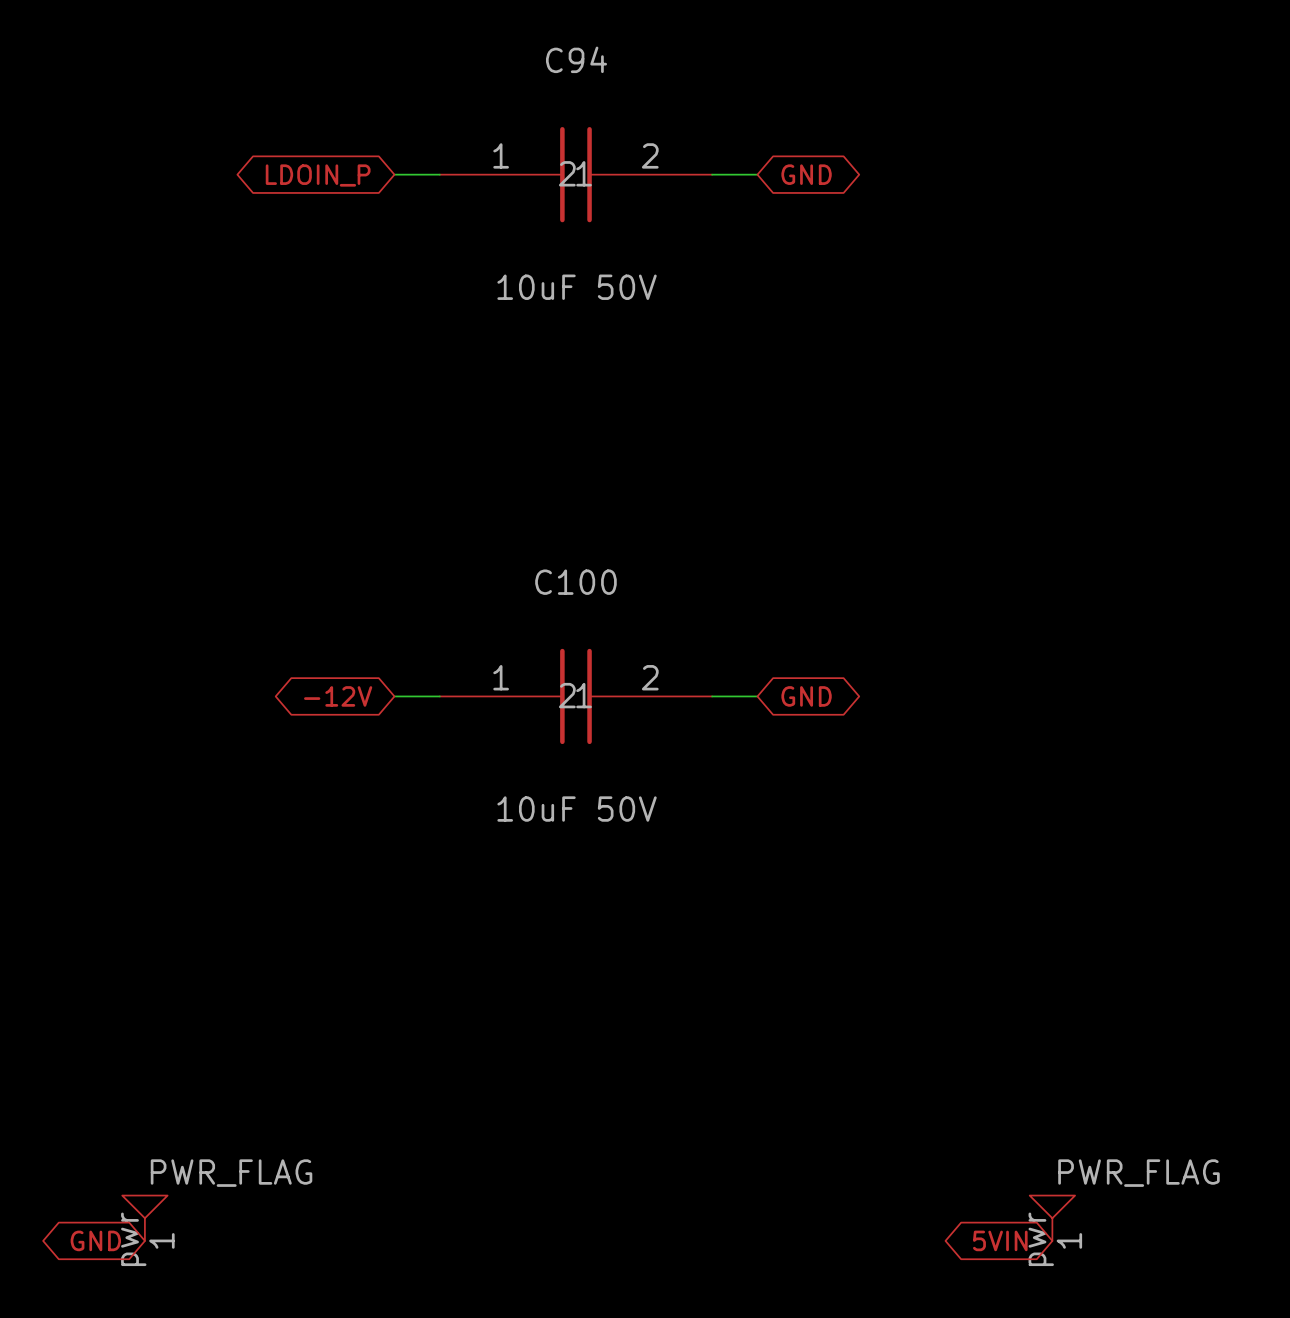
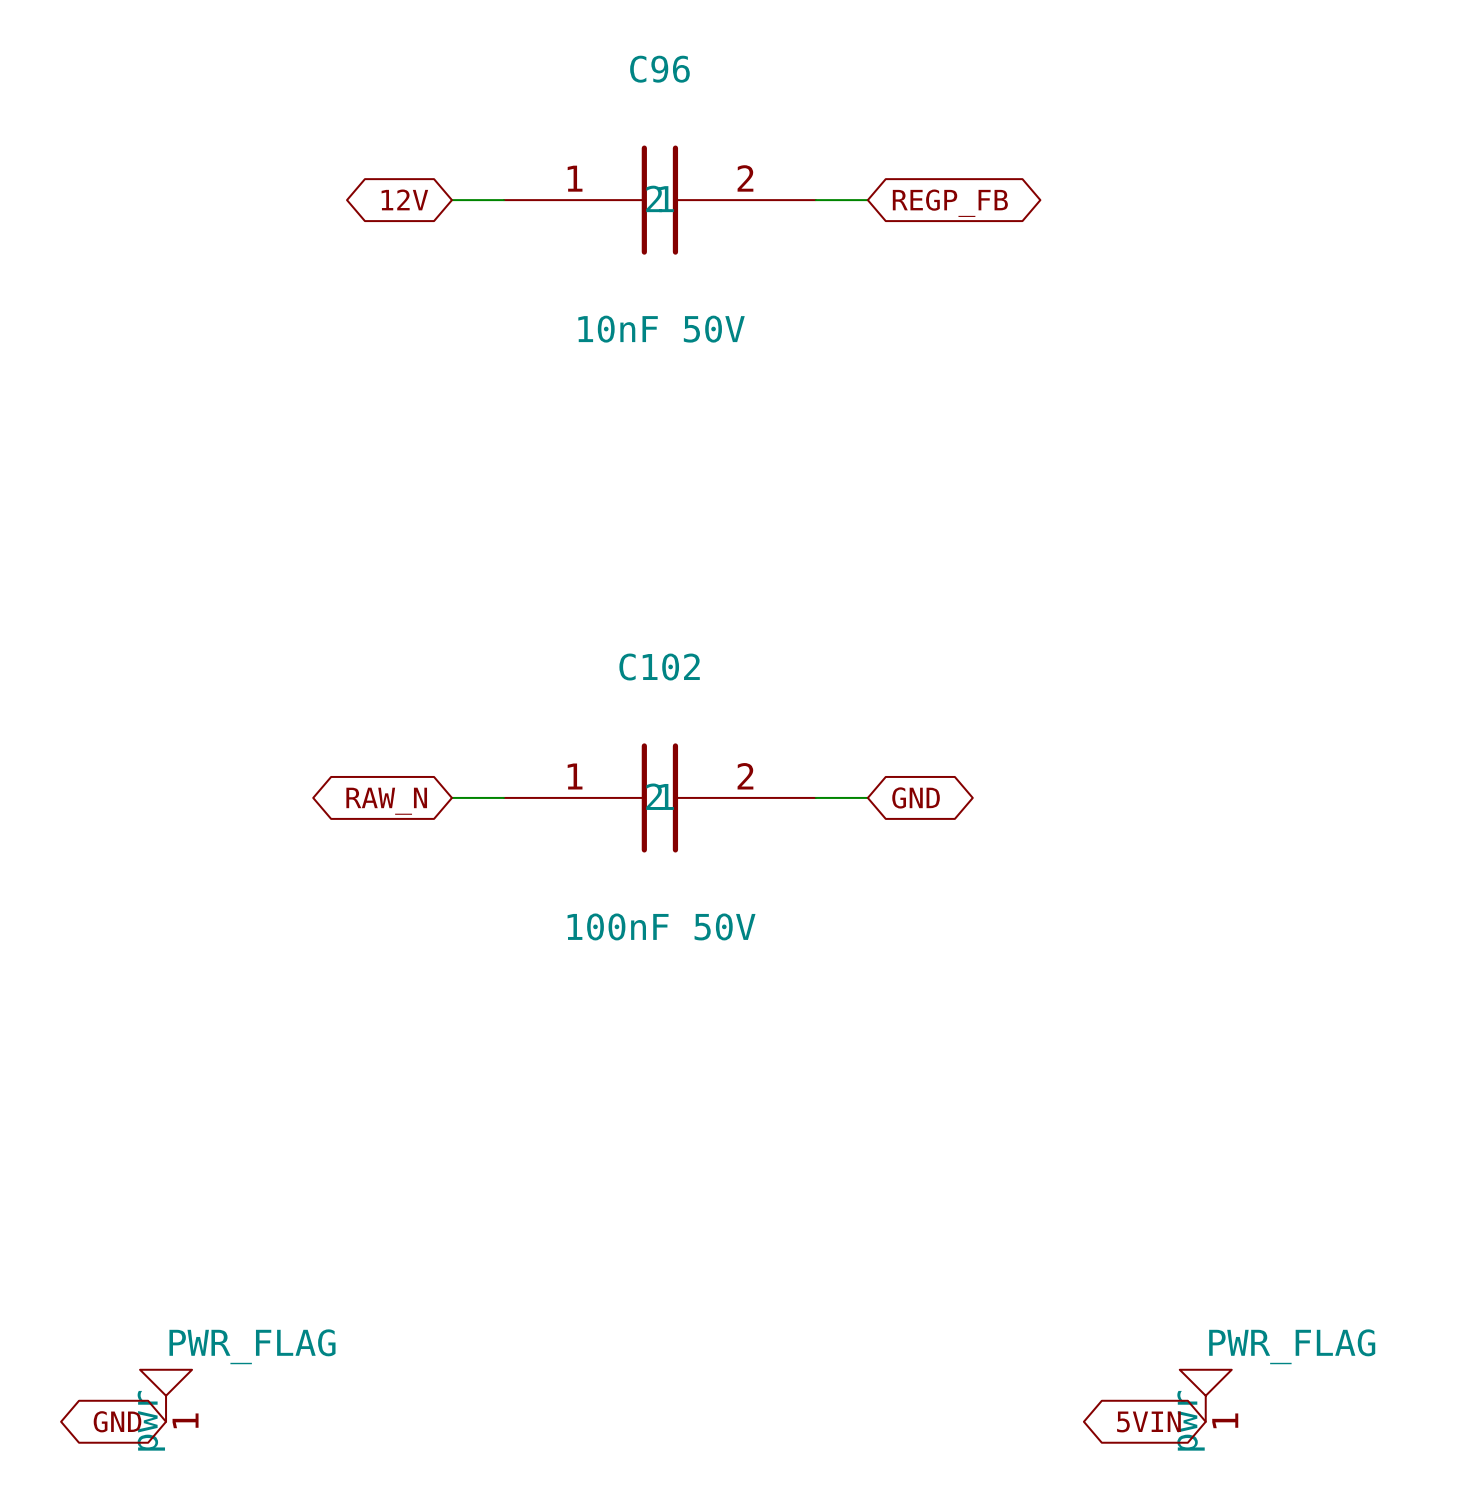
C94 name: C94 (576, 59) -> C96 (659, 69)
global label: GND (806, 174) -> REGP_FB (950, 203)
global label: LDOIN_P (318, 175) -> 12V (404, 199)
C94 value: 10uF 50V (577, 287) -> 10nF 50V (661, 329)
C100 name: C100 (575, 582) -> C102 (659, 667)
global label: -12V (338, 696) -> RAW_N (386, 801)
C100 value: 10uF 50V (577, 809) -> 100nF 50V (661, 926)

